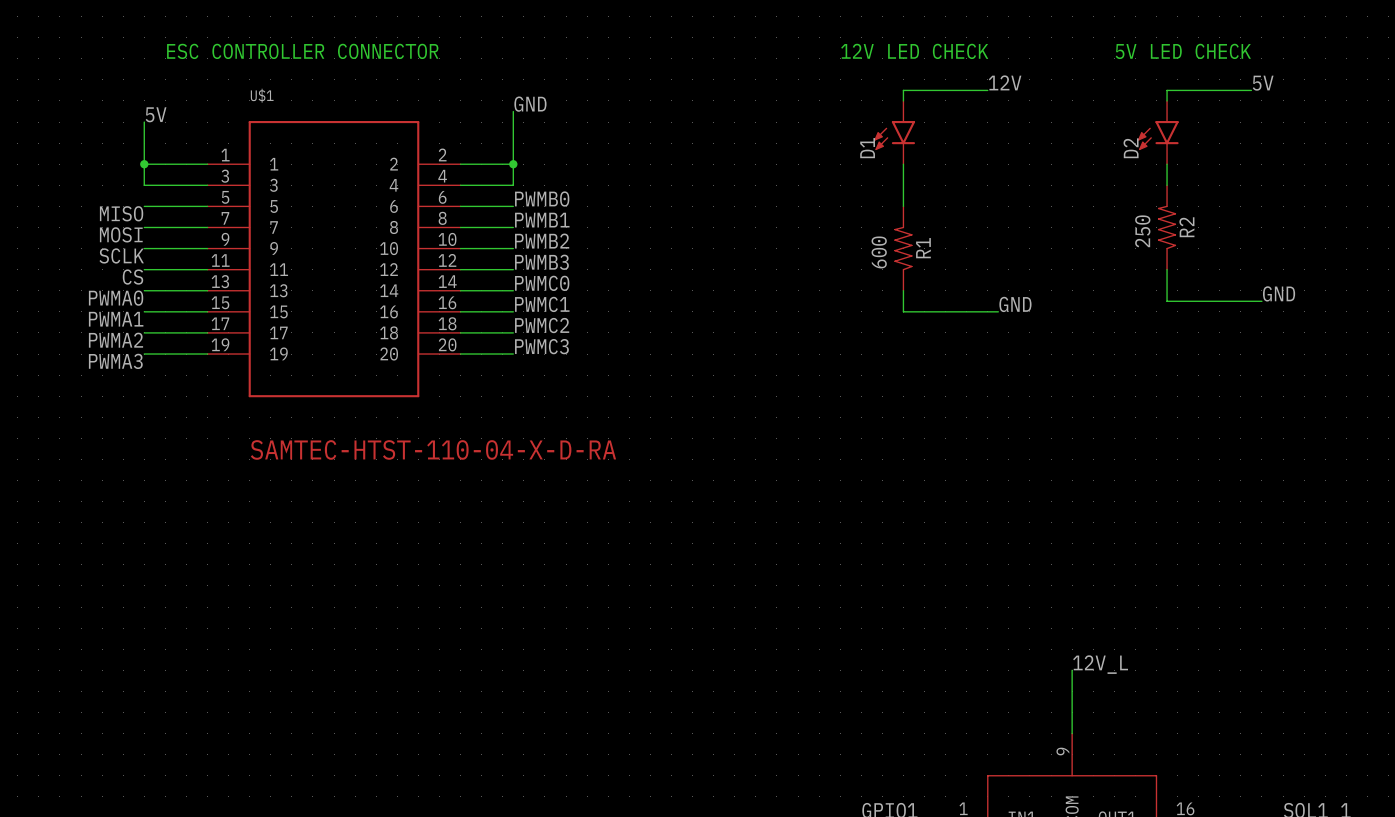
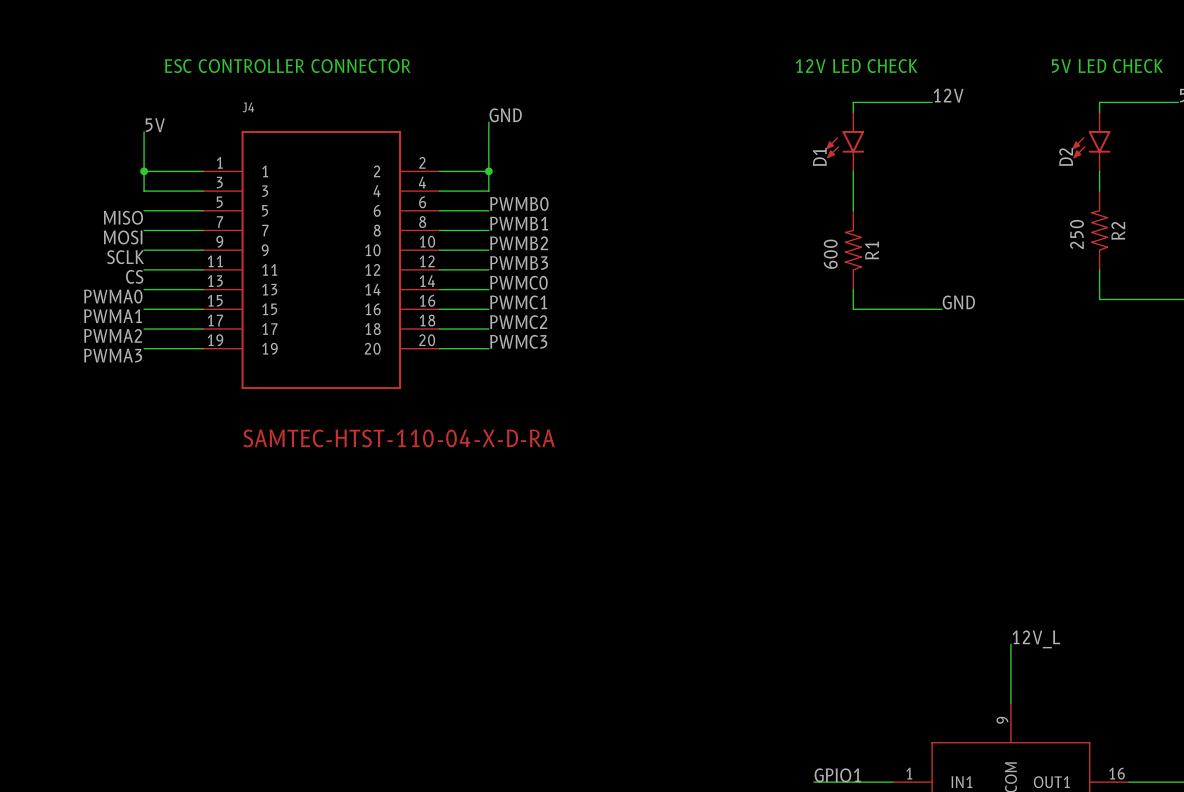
U$1 name: U$1 (262, 95) -> J4 (248, 107)

